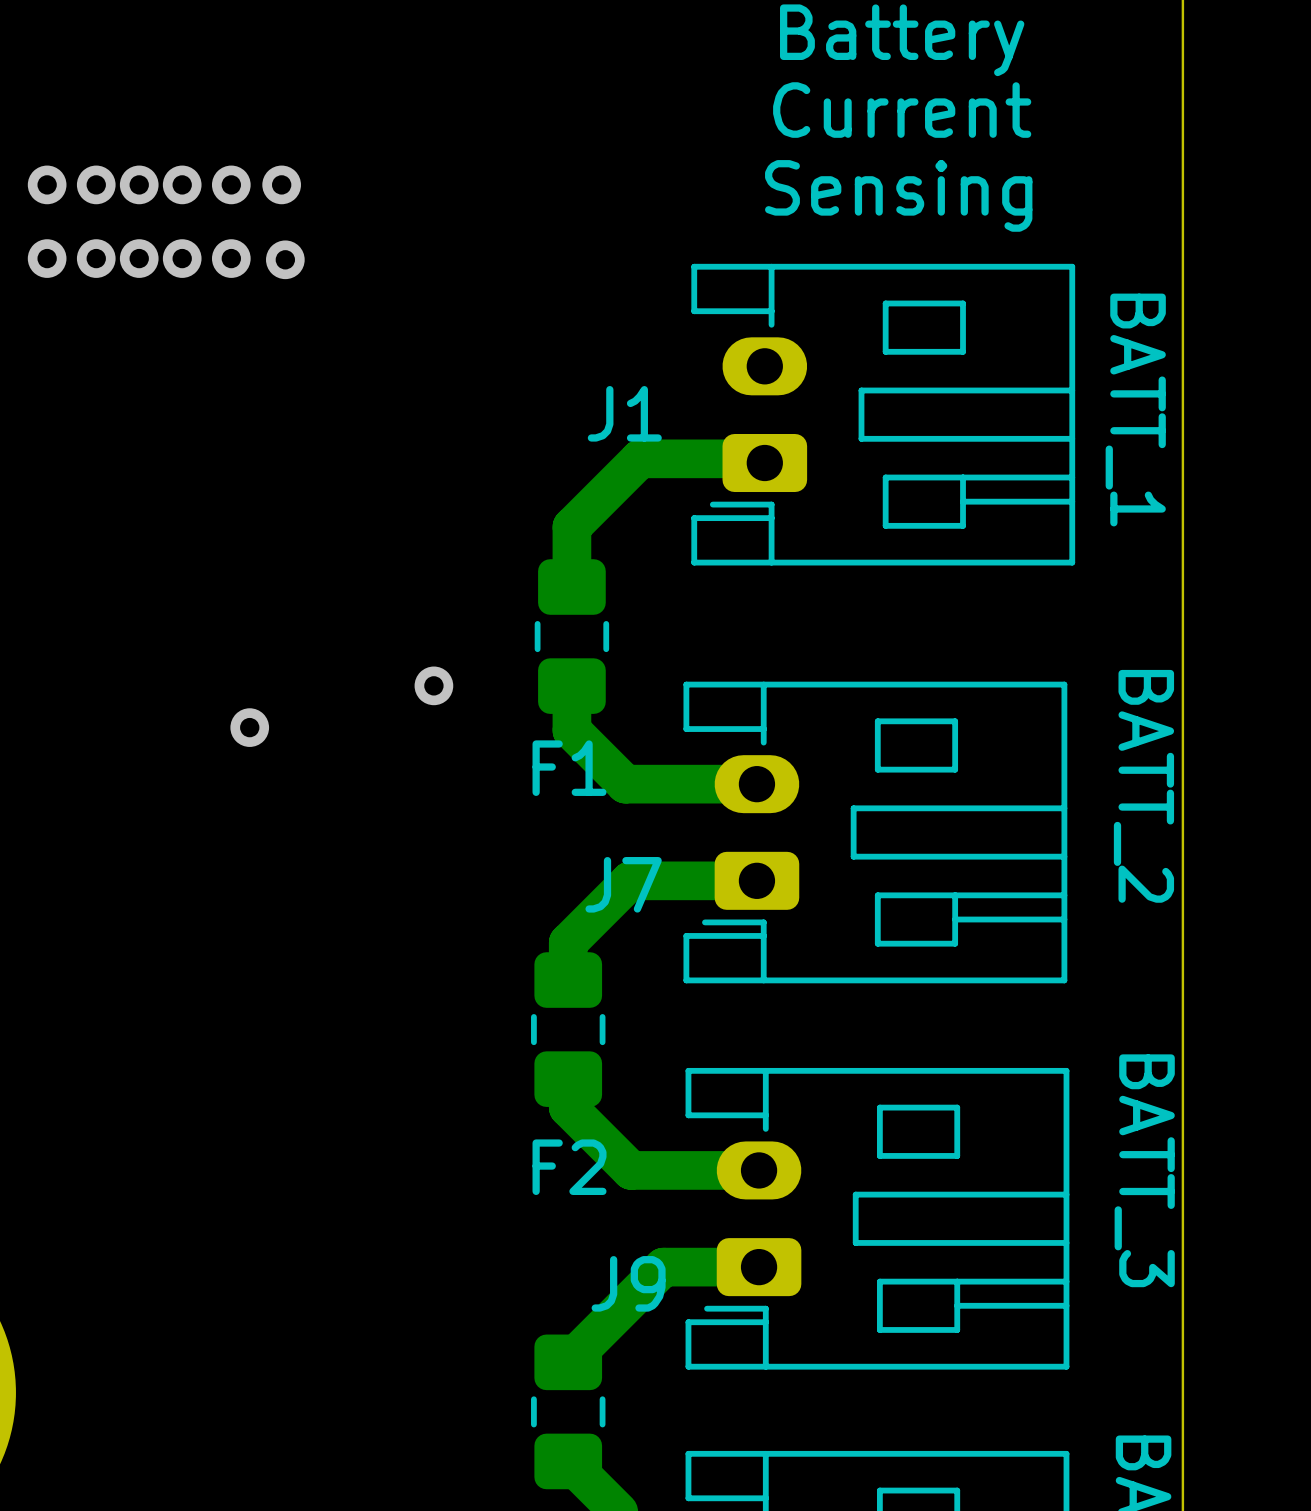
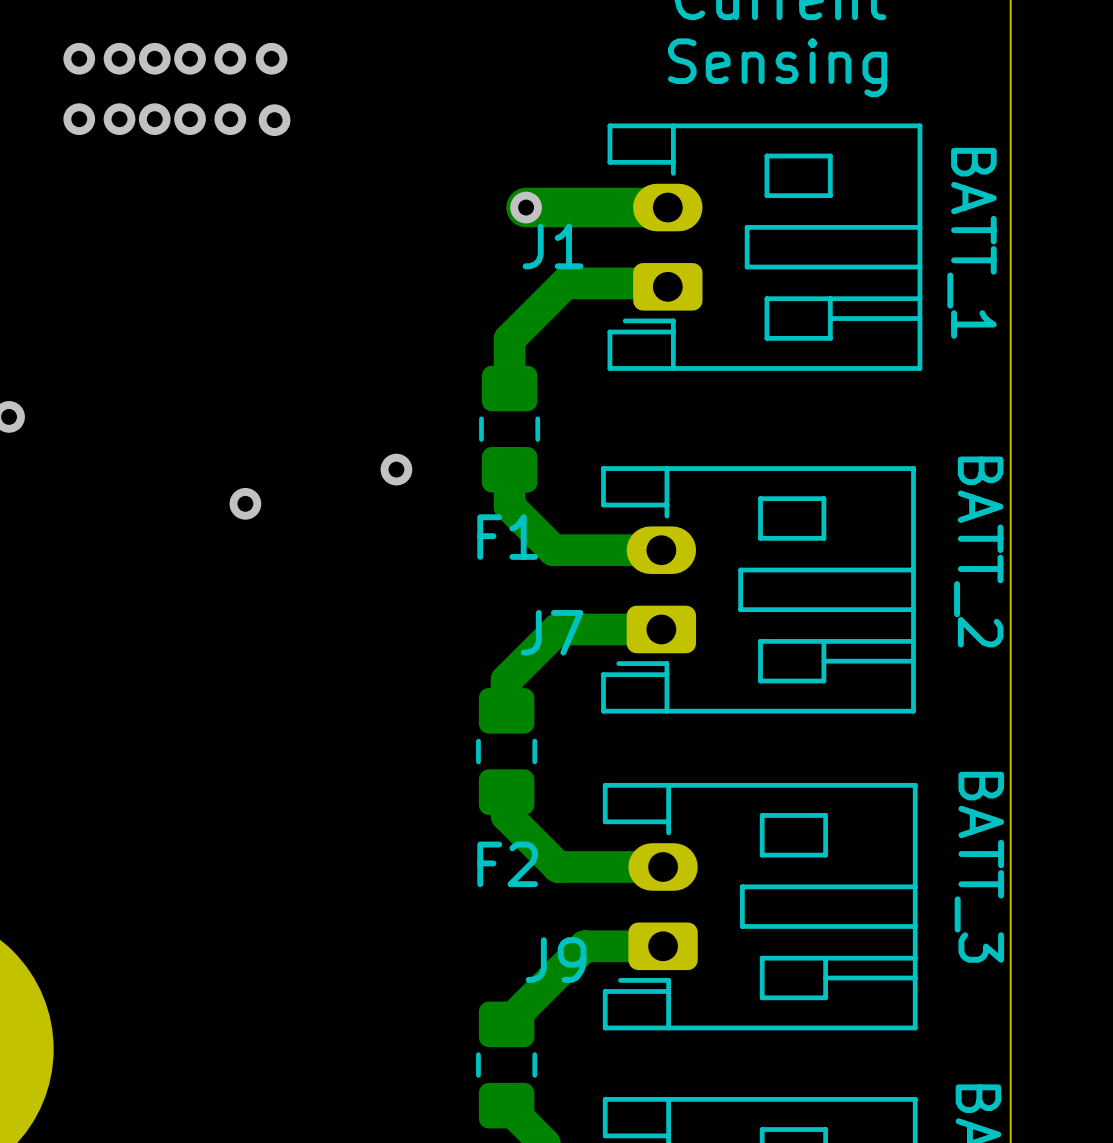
via: none -> (526, 207)
track: none -> (667, 207) (526, 207)

